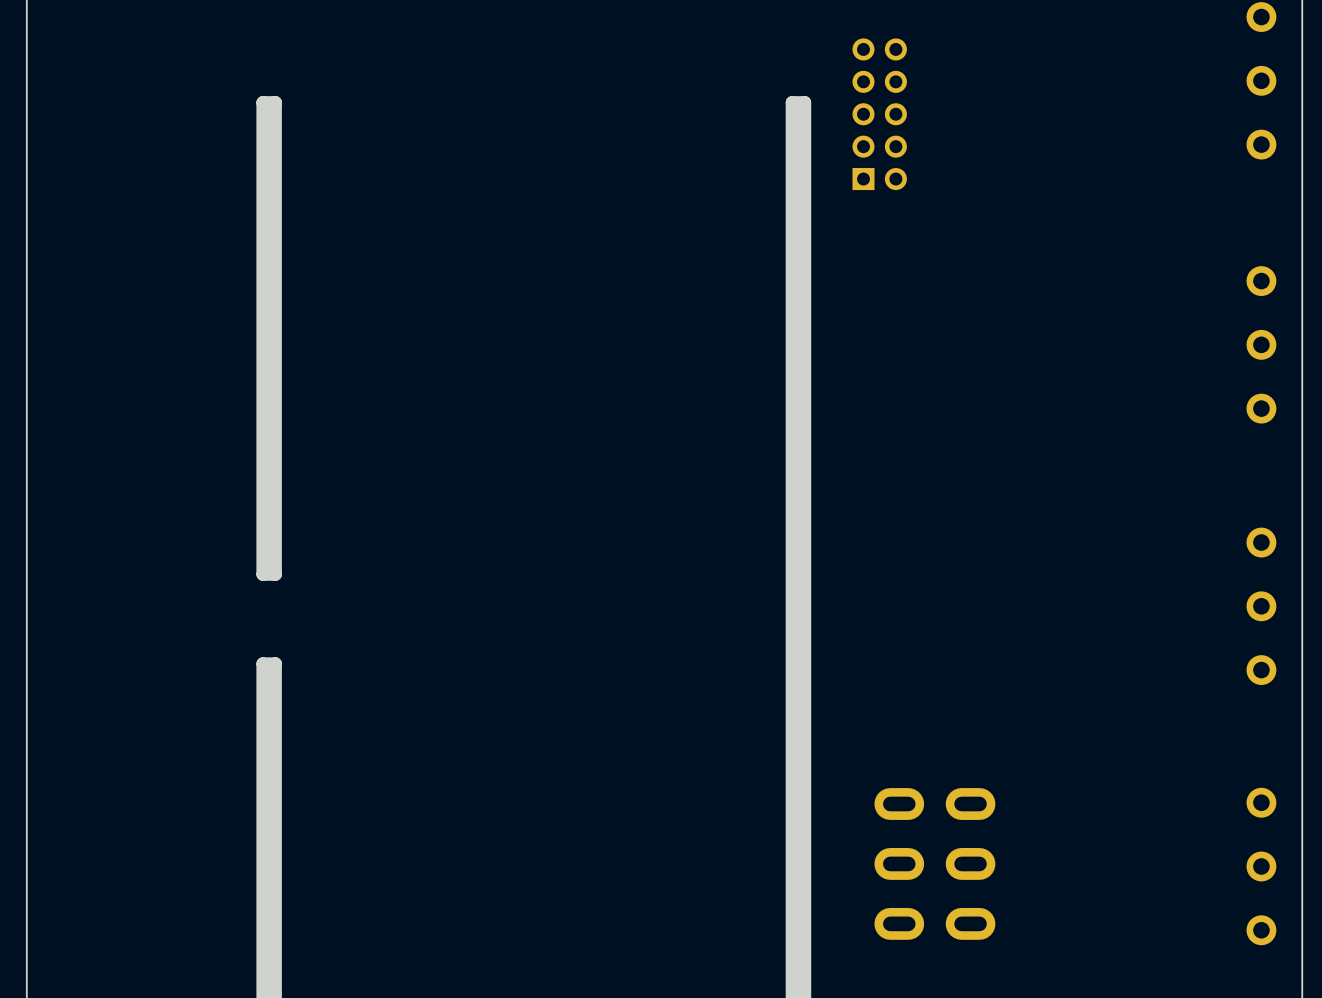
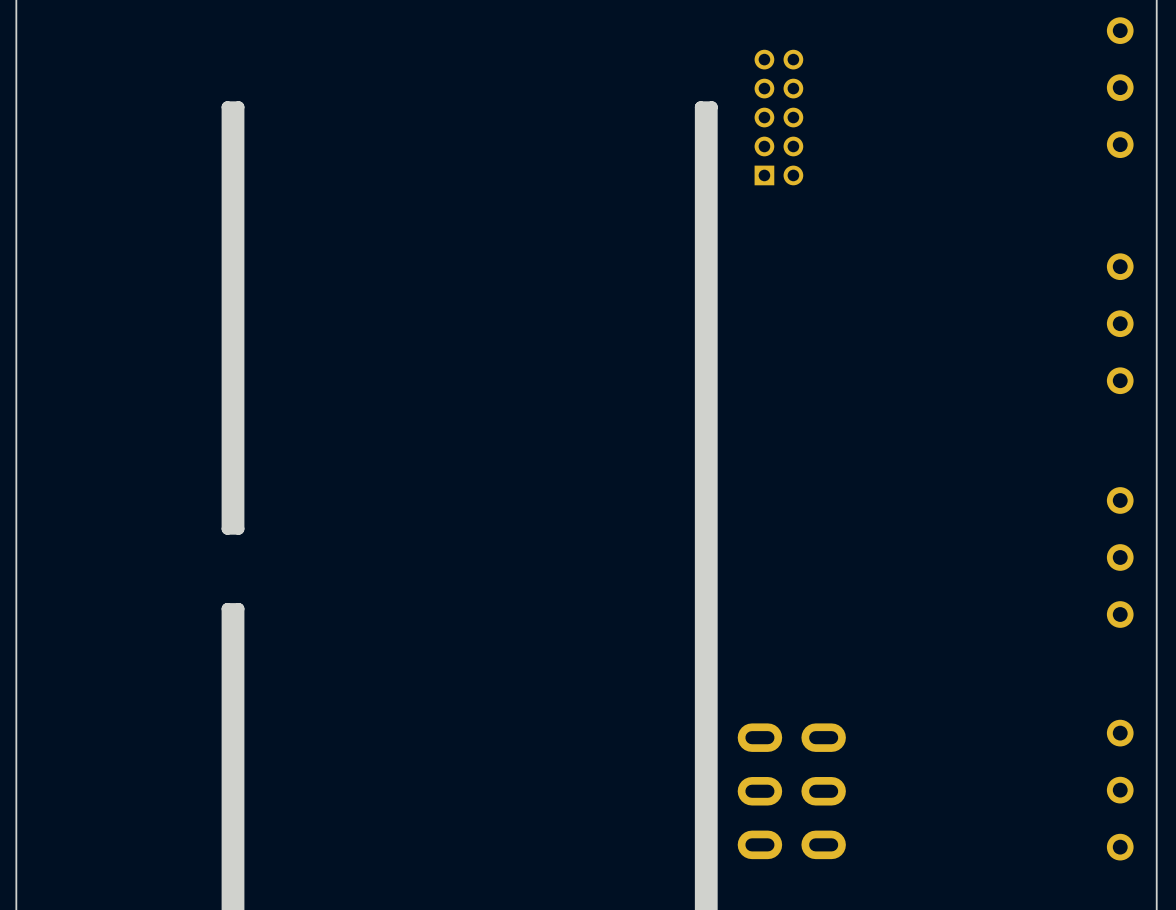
part position: (934, 863) -> (791, 791)

